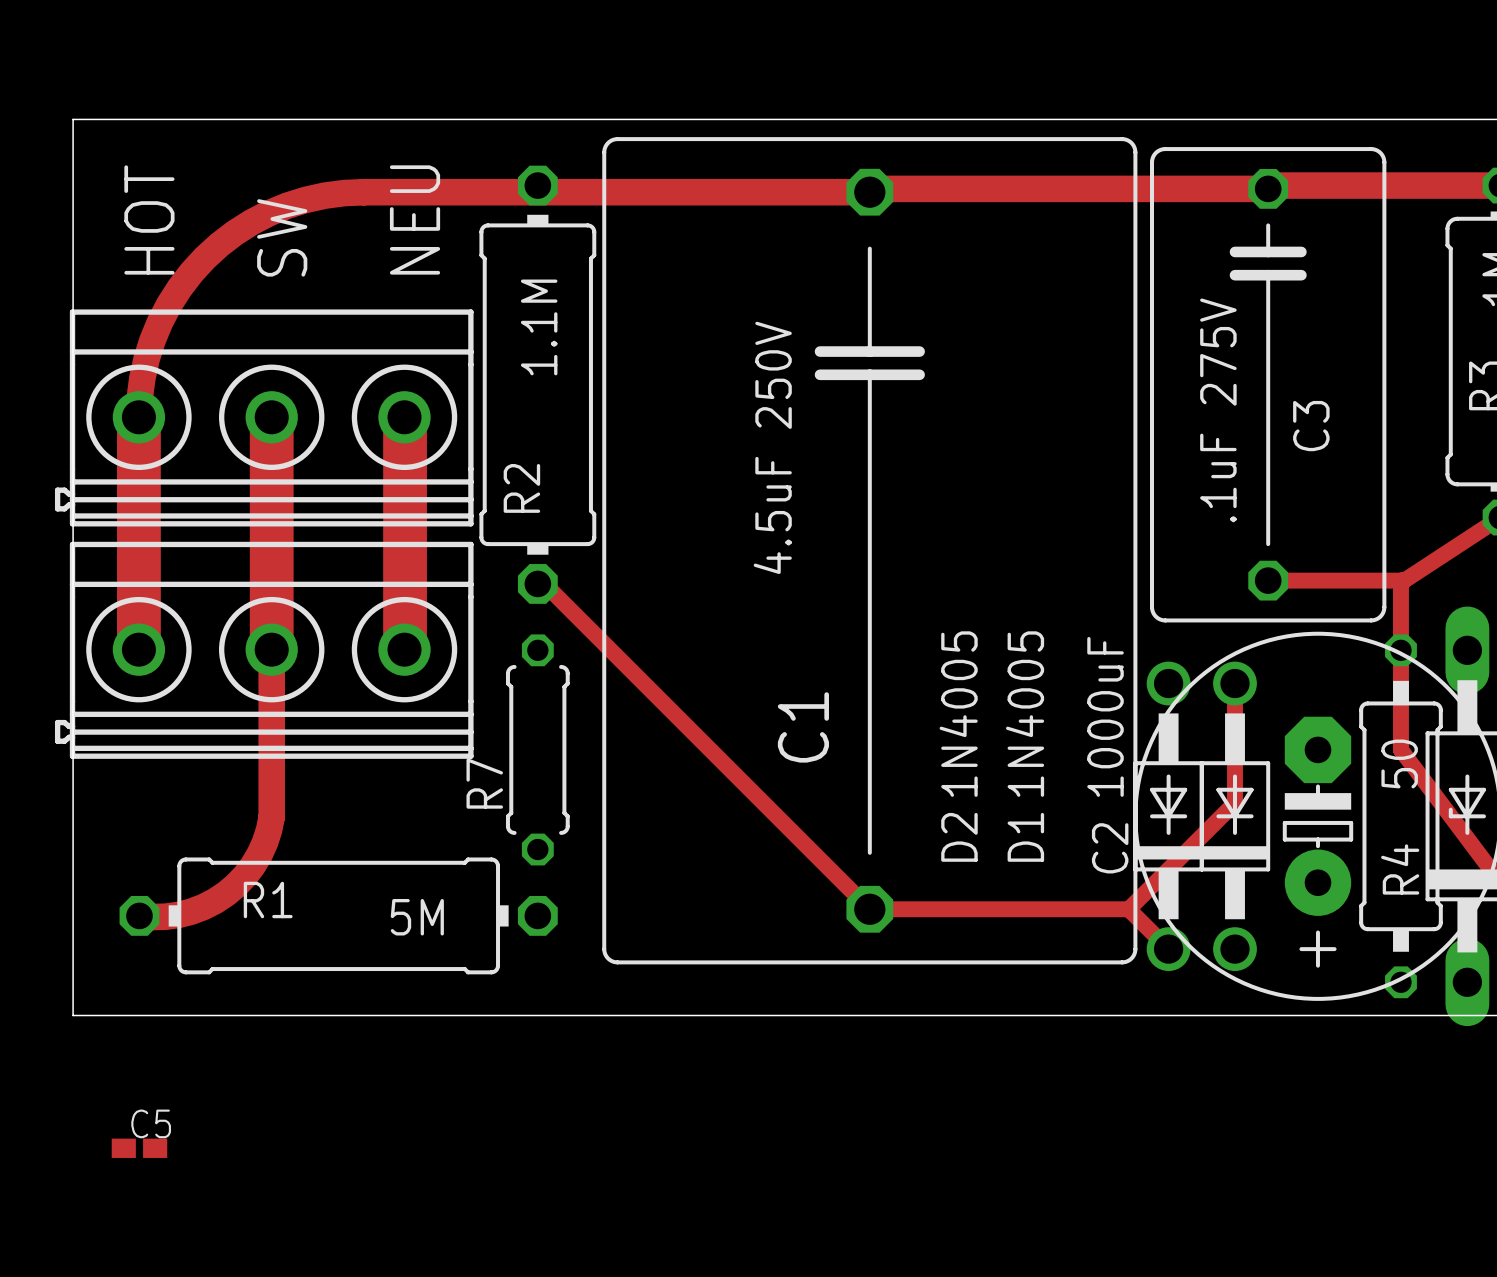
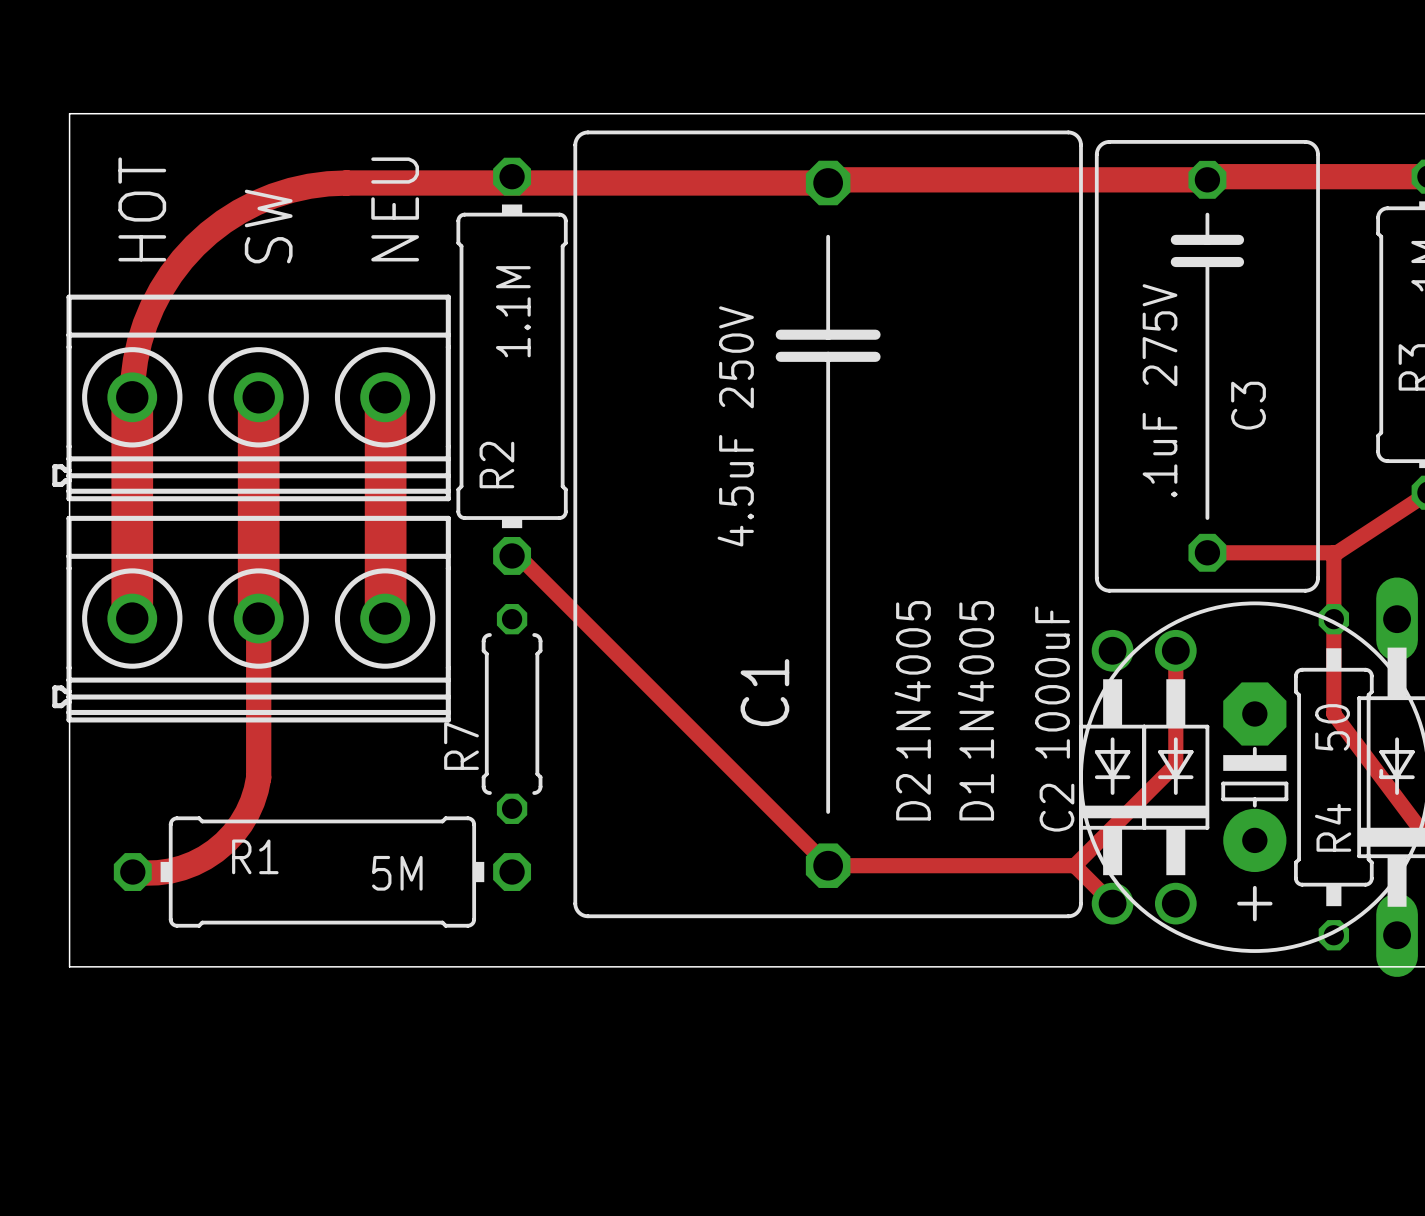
C5: (139, 1148) -> none

